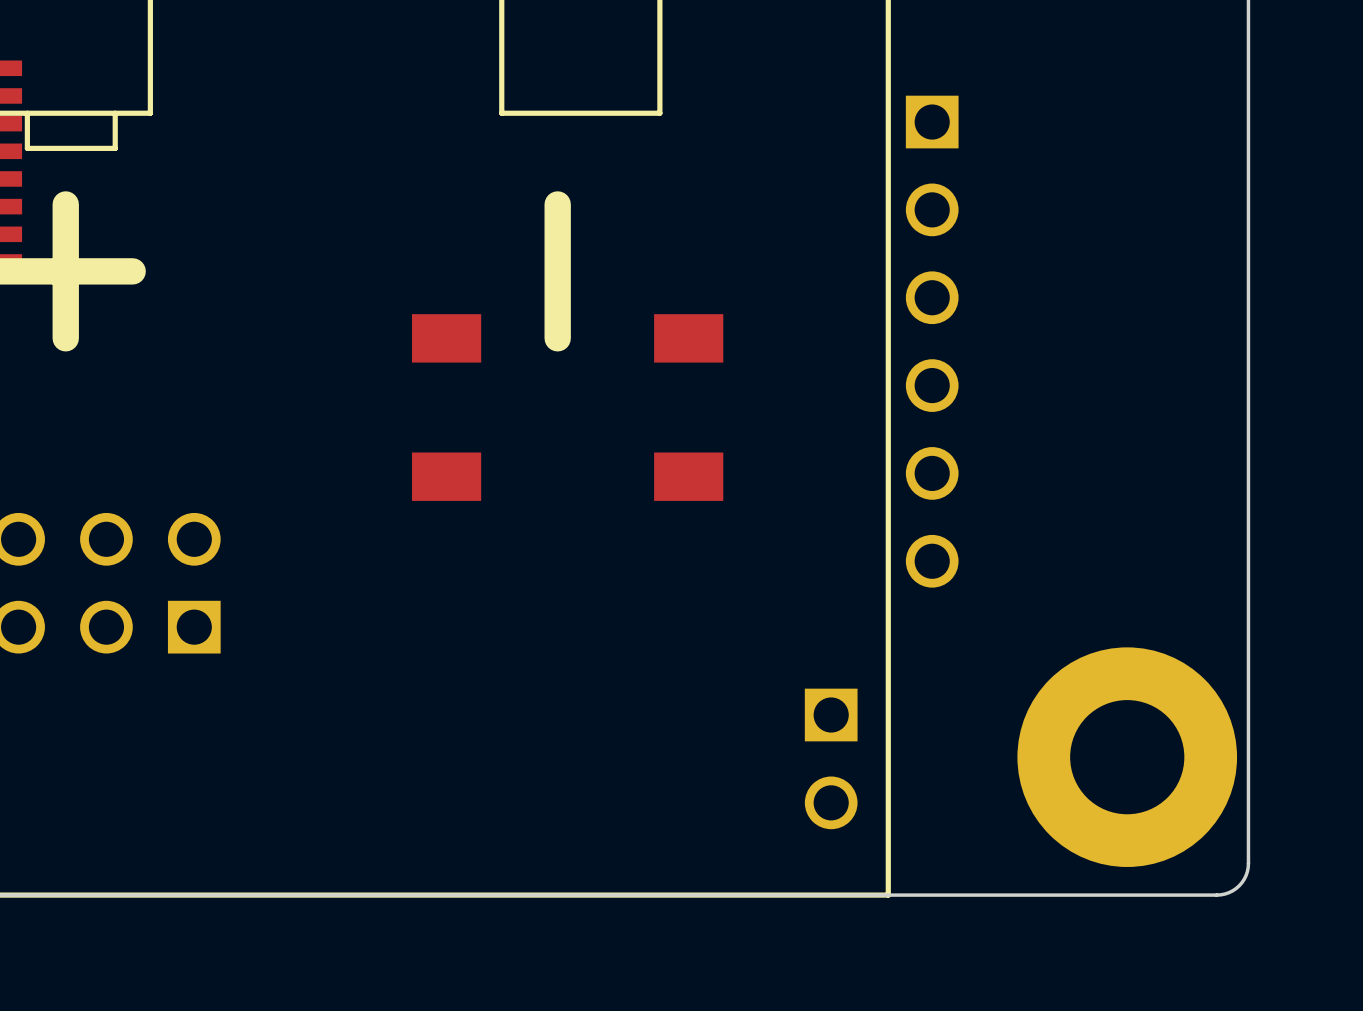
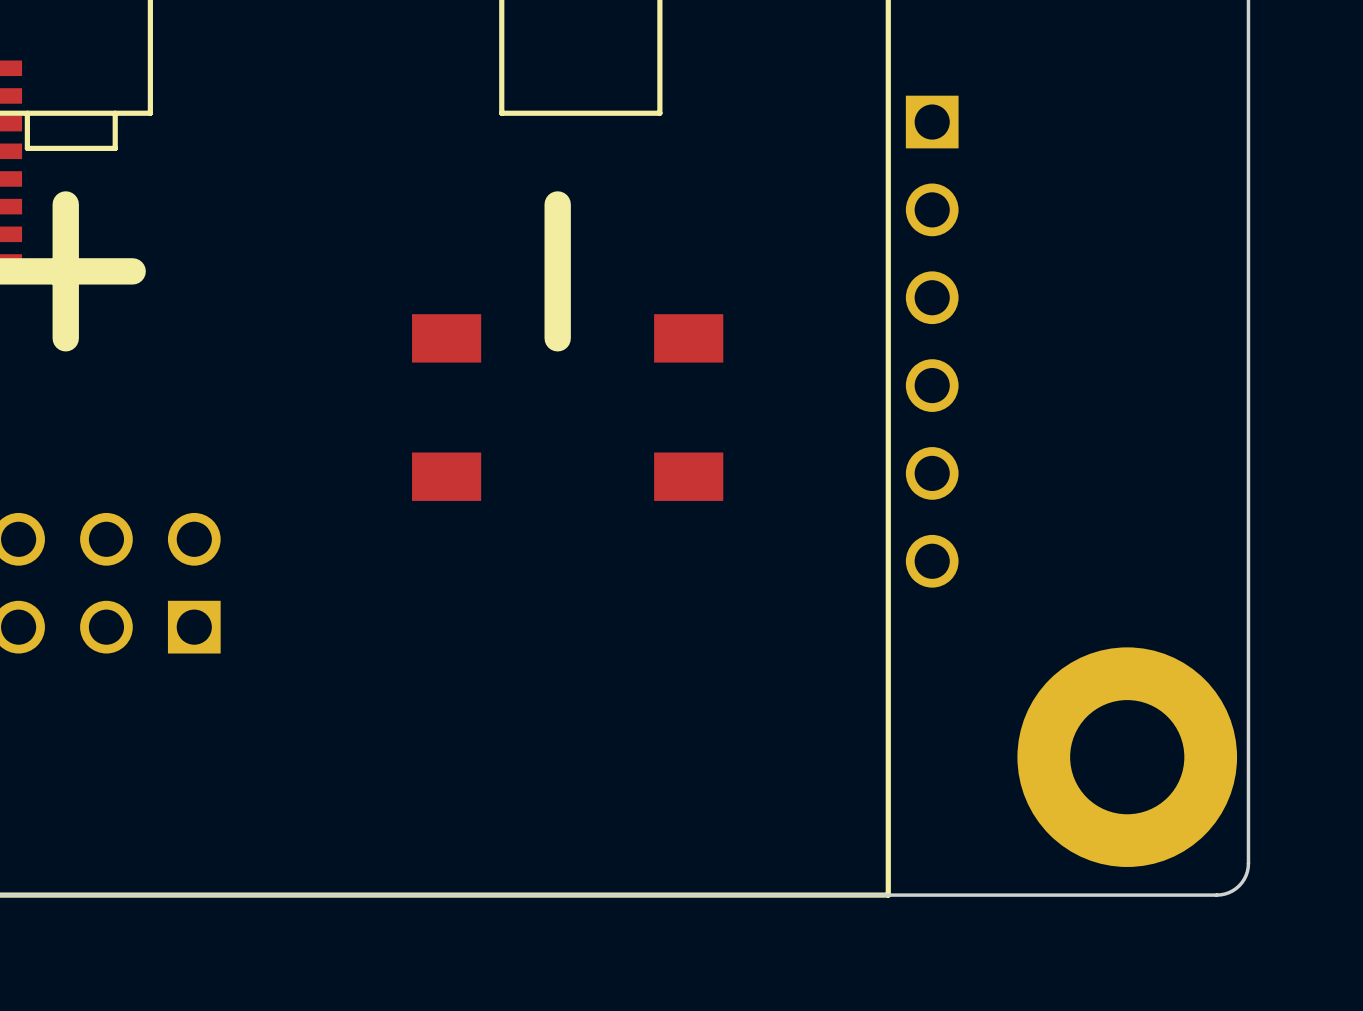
part: (831, 758) -> none

